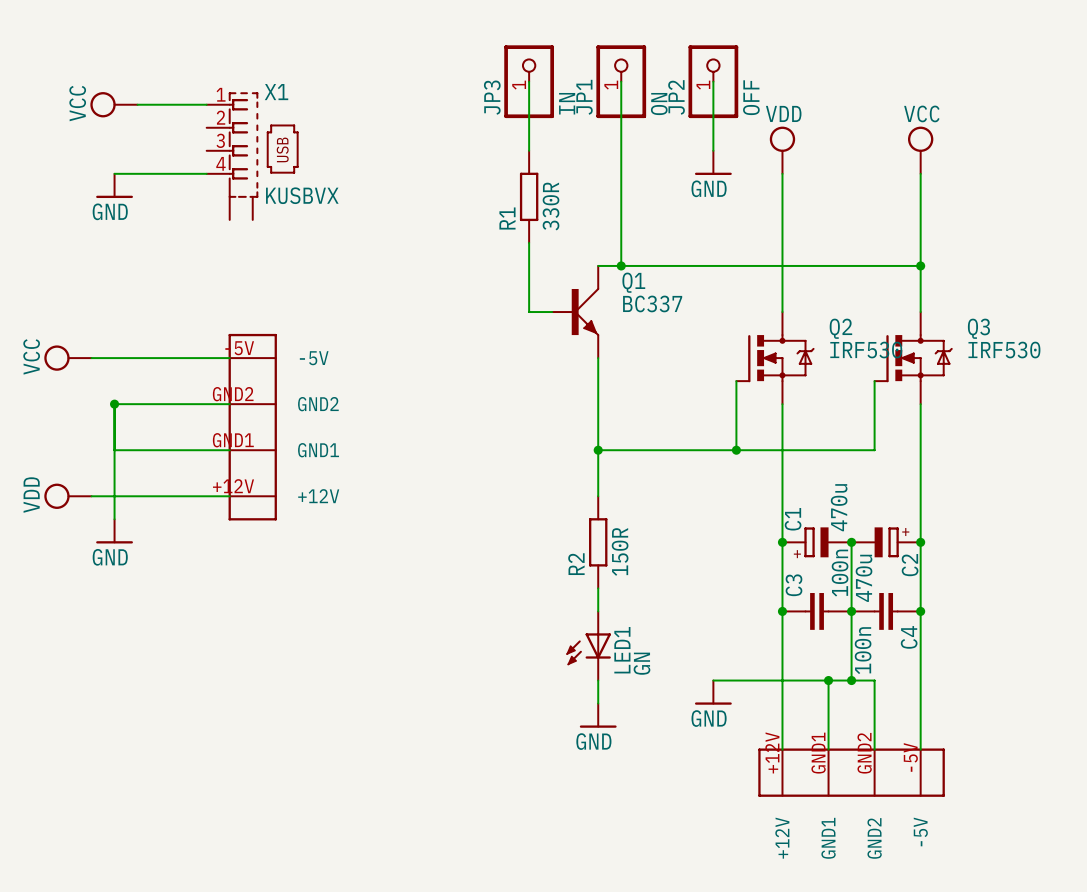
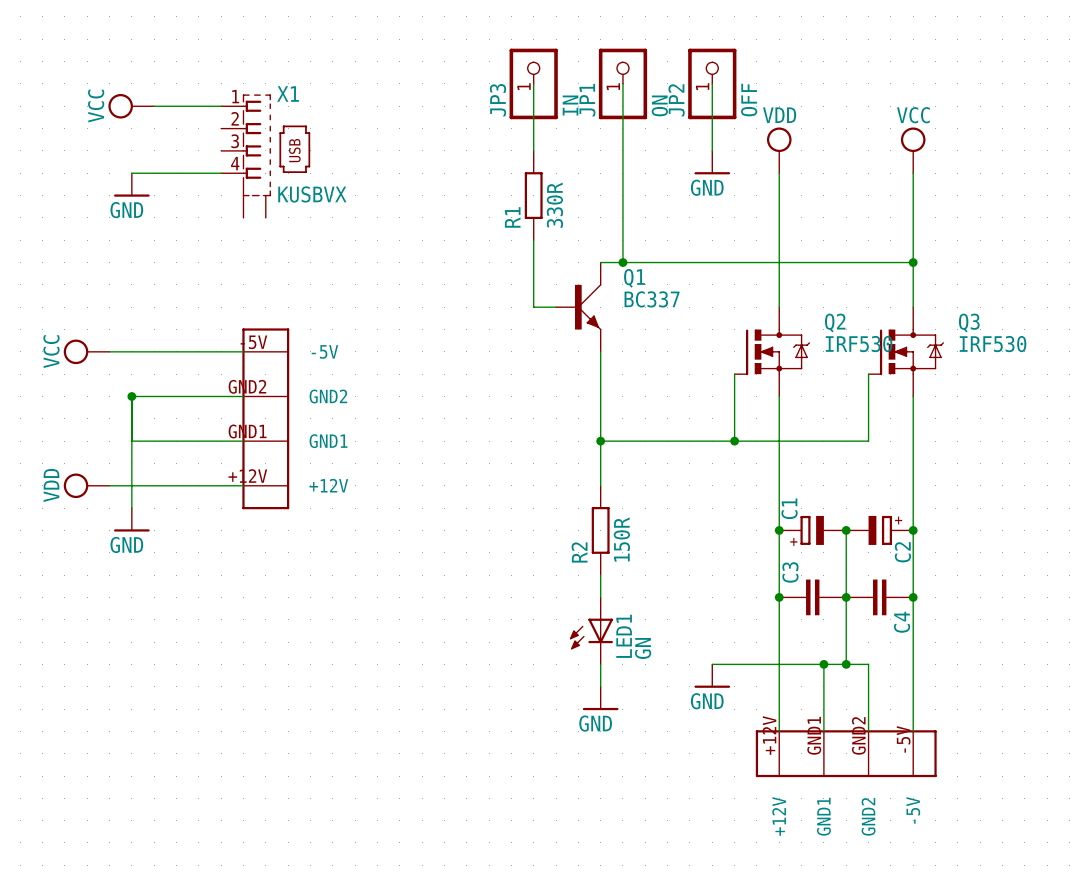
C1 value: 470u (839, 507) -> none
C3 value: 100n (840, 573) -> none
C2 value: 470u (864, 578) -> none
C4 value: 100n (863, 650) -> none

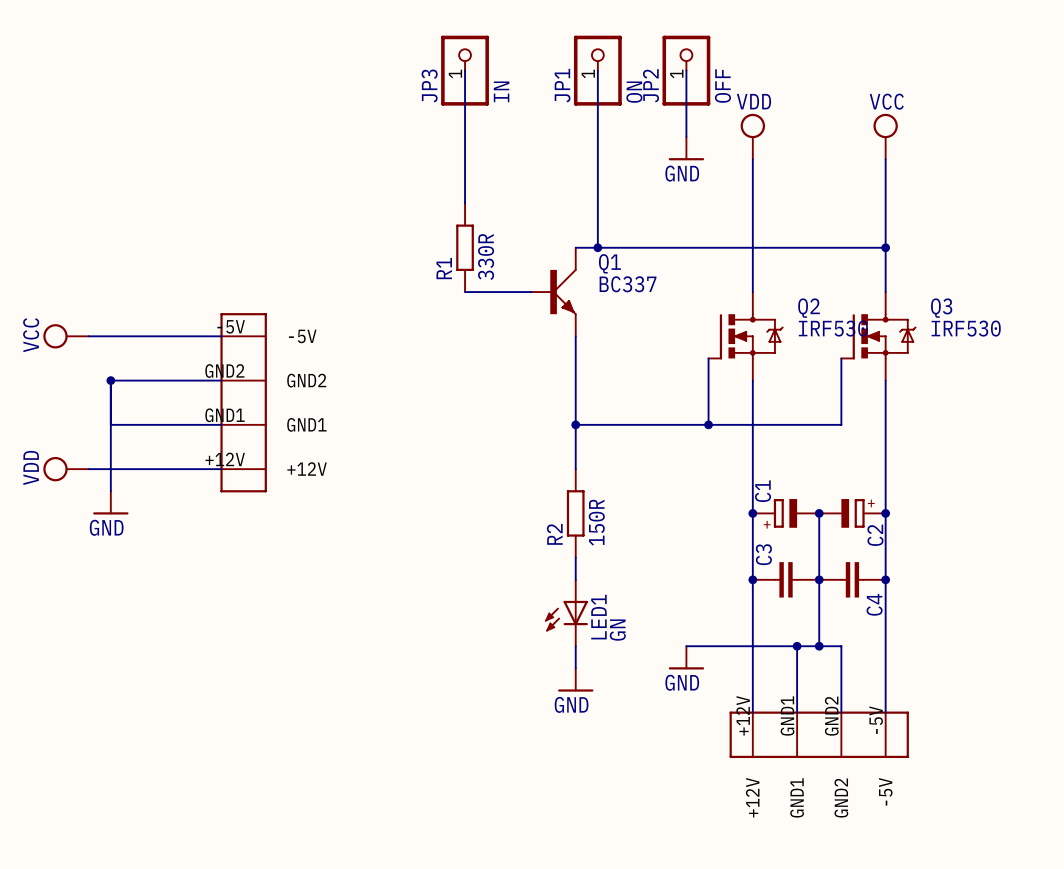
wire: none -> (465, 70) (465, 203)
wire: (533, 83) (533, 150) -> none
JP3 position: (533, 83) -> (465, 70)
power symbol: VCC (131, 106) -> none
wire: (154, 106) (221, 106) -> none
X1: KUSBVX (265, 156) -> none
wire: (131, 173) (221, 173) -> none
power symbol: GND (131, 184) -> none
R1 position: (533, 195) -> (465, 247)
wire: (533, 240) (533, 307) -> (465, 292) (509, 292)

